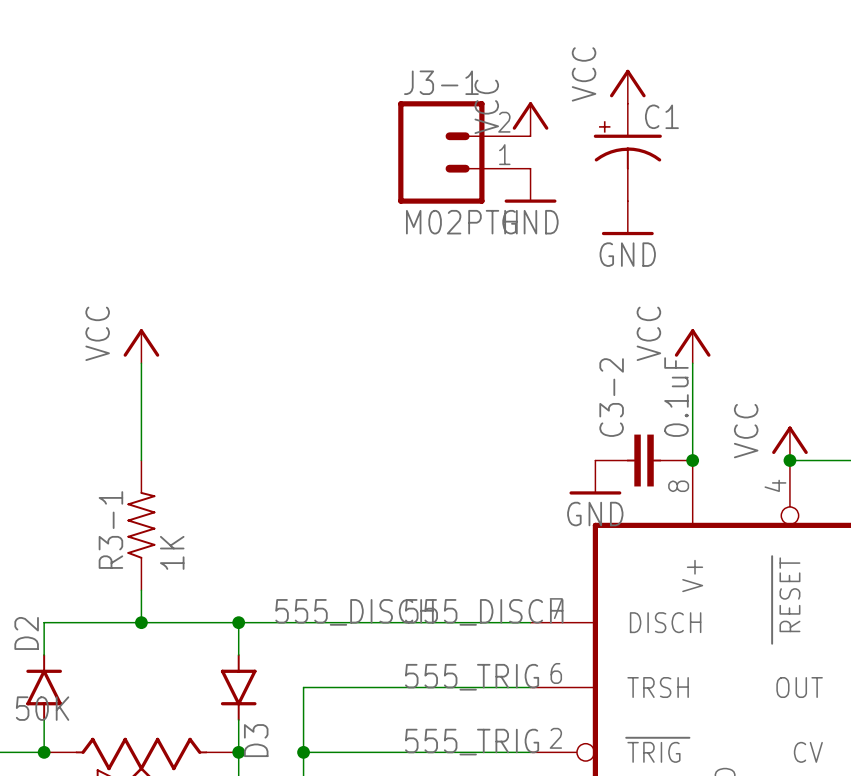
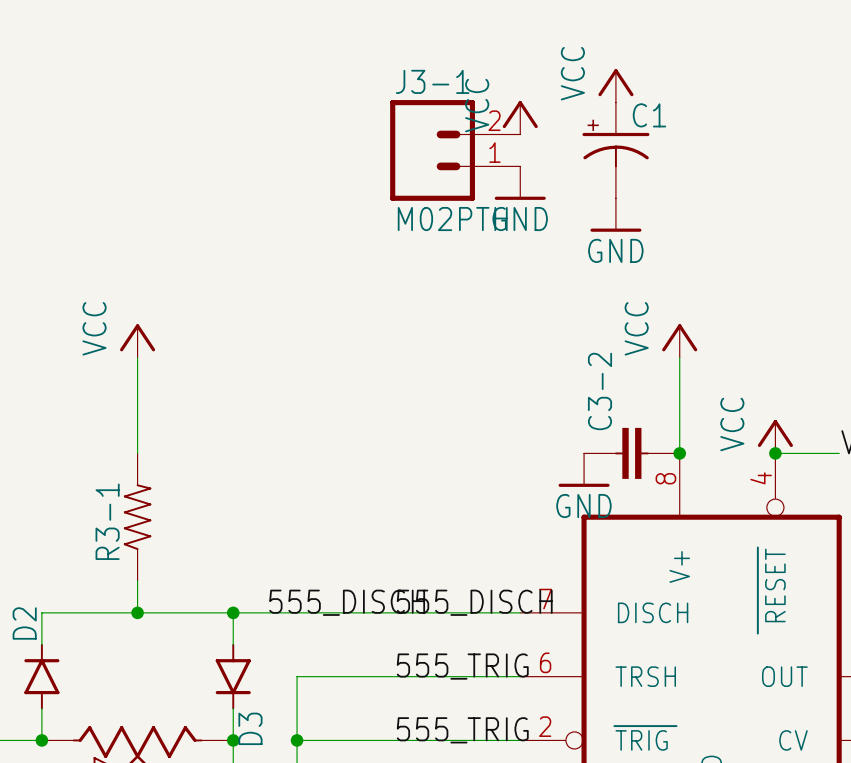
C3-2 value: 0.1uF (676, 397) -> none
R3-1 value: 1K (172, 552) -> none
part value: 50K (42, 708) -> none

